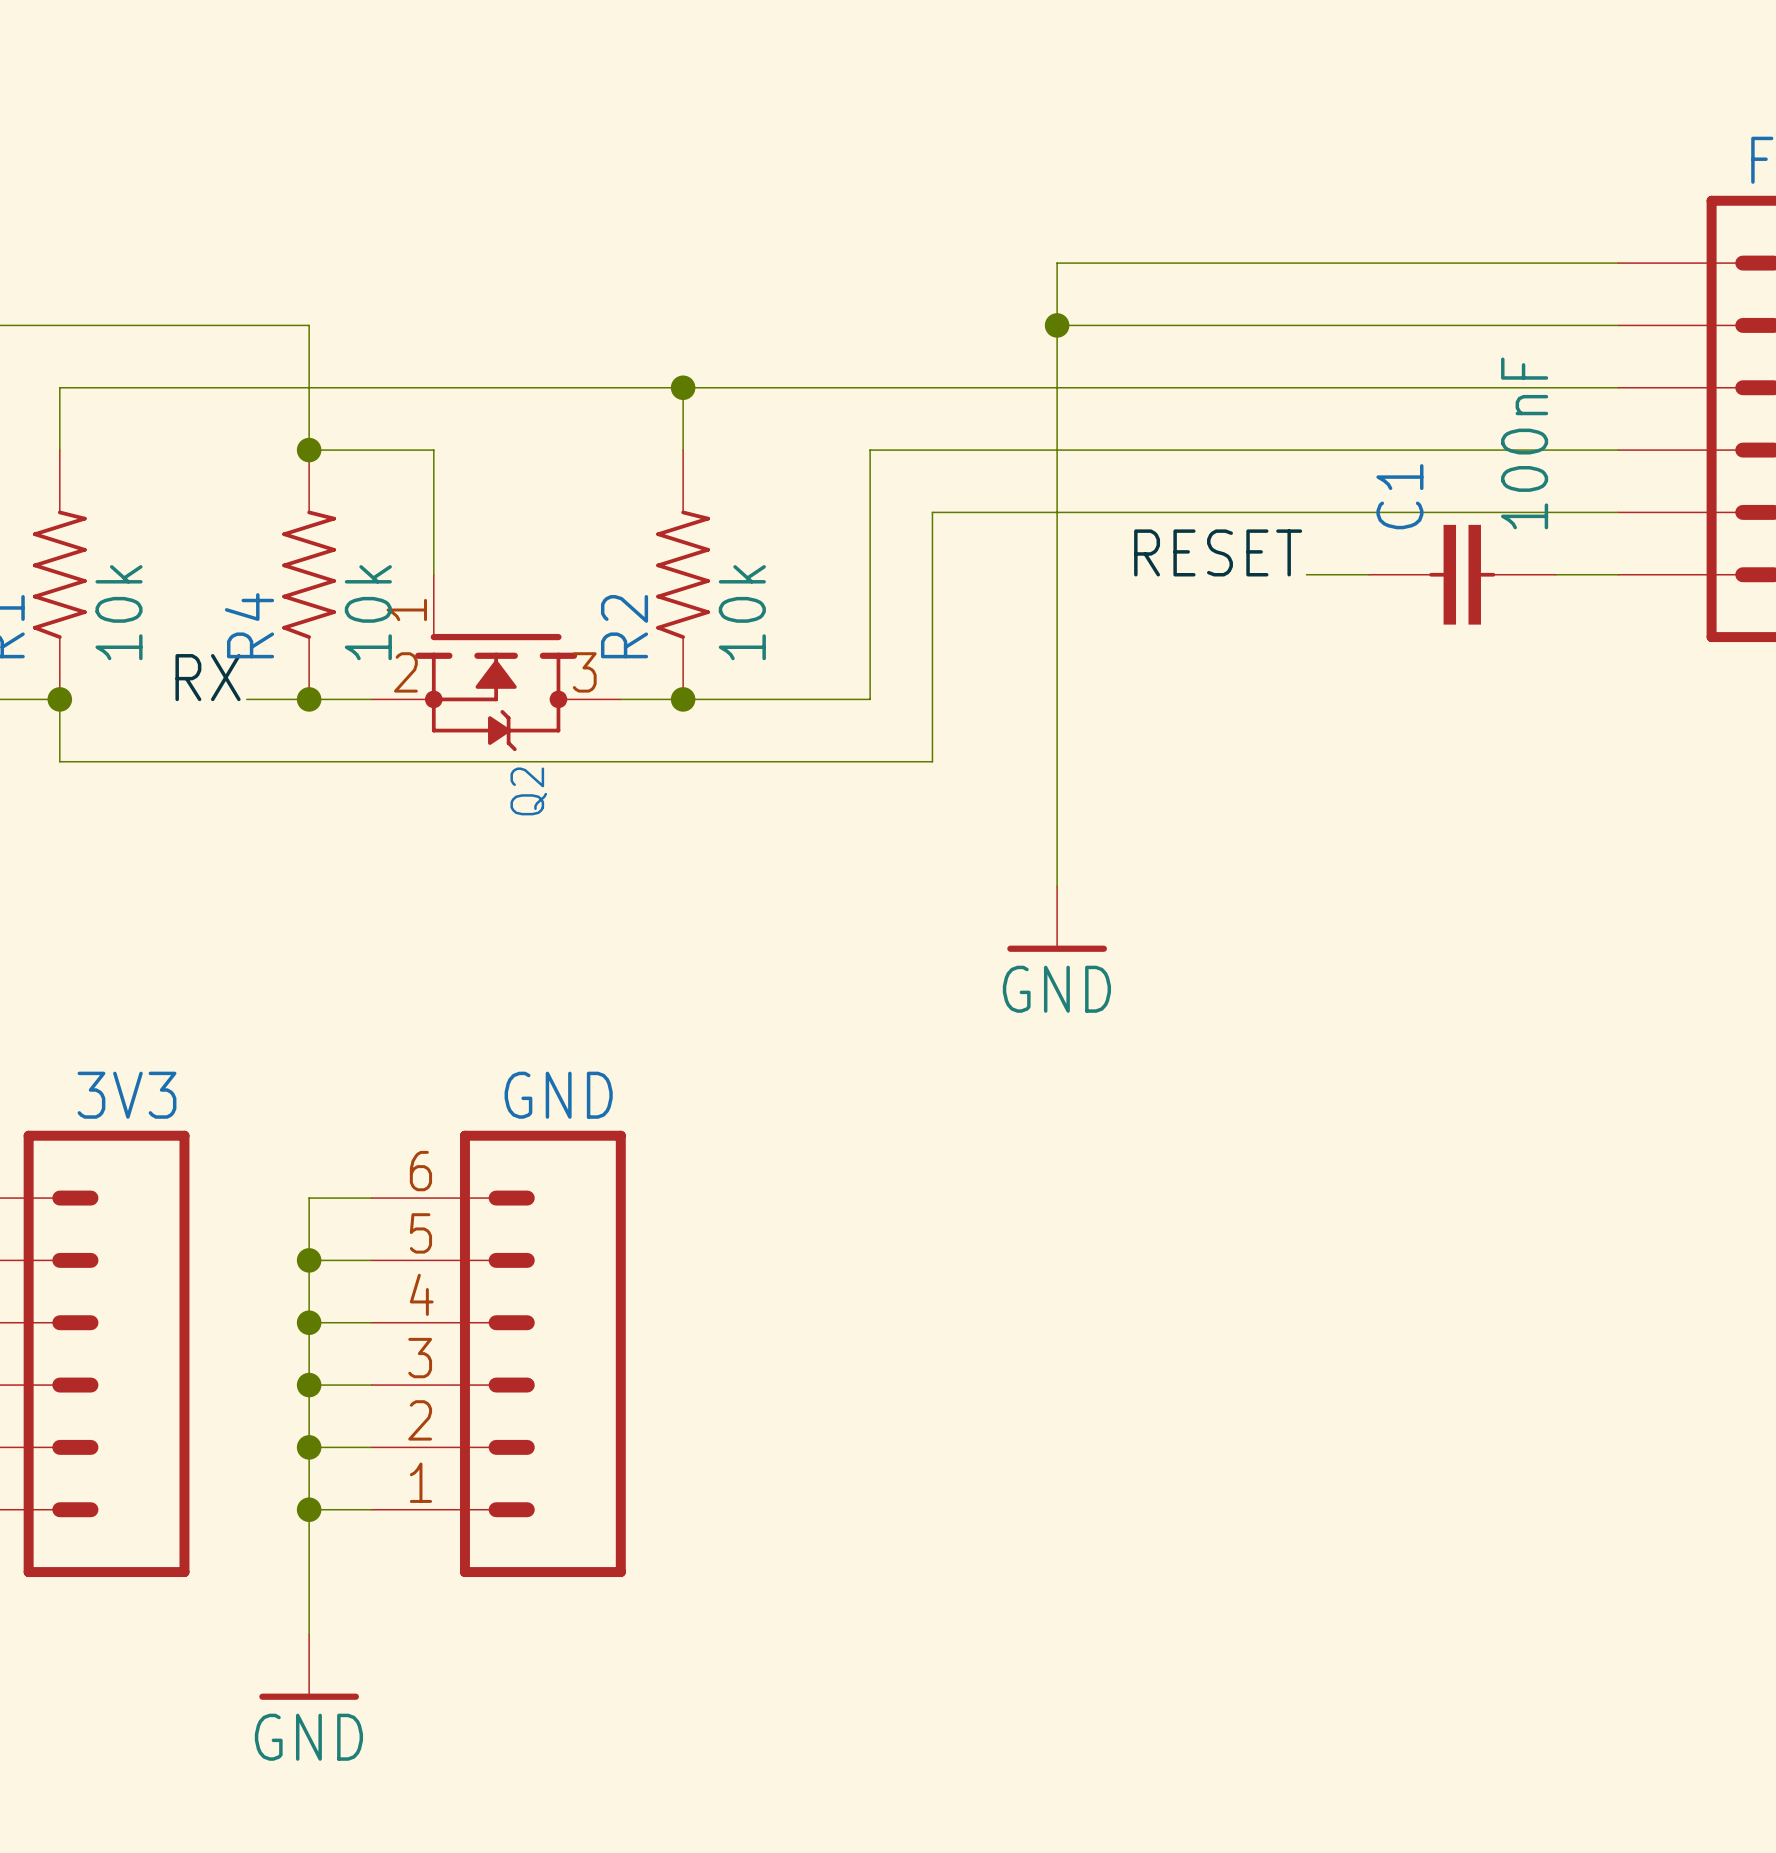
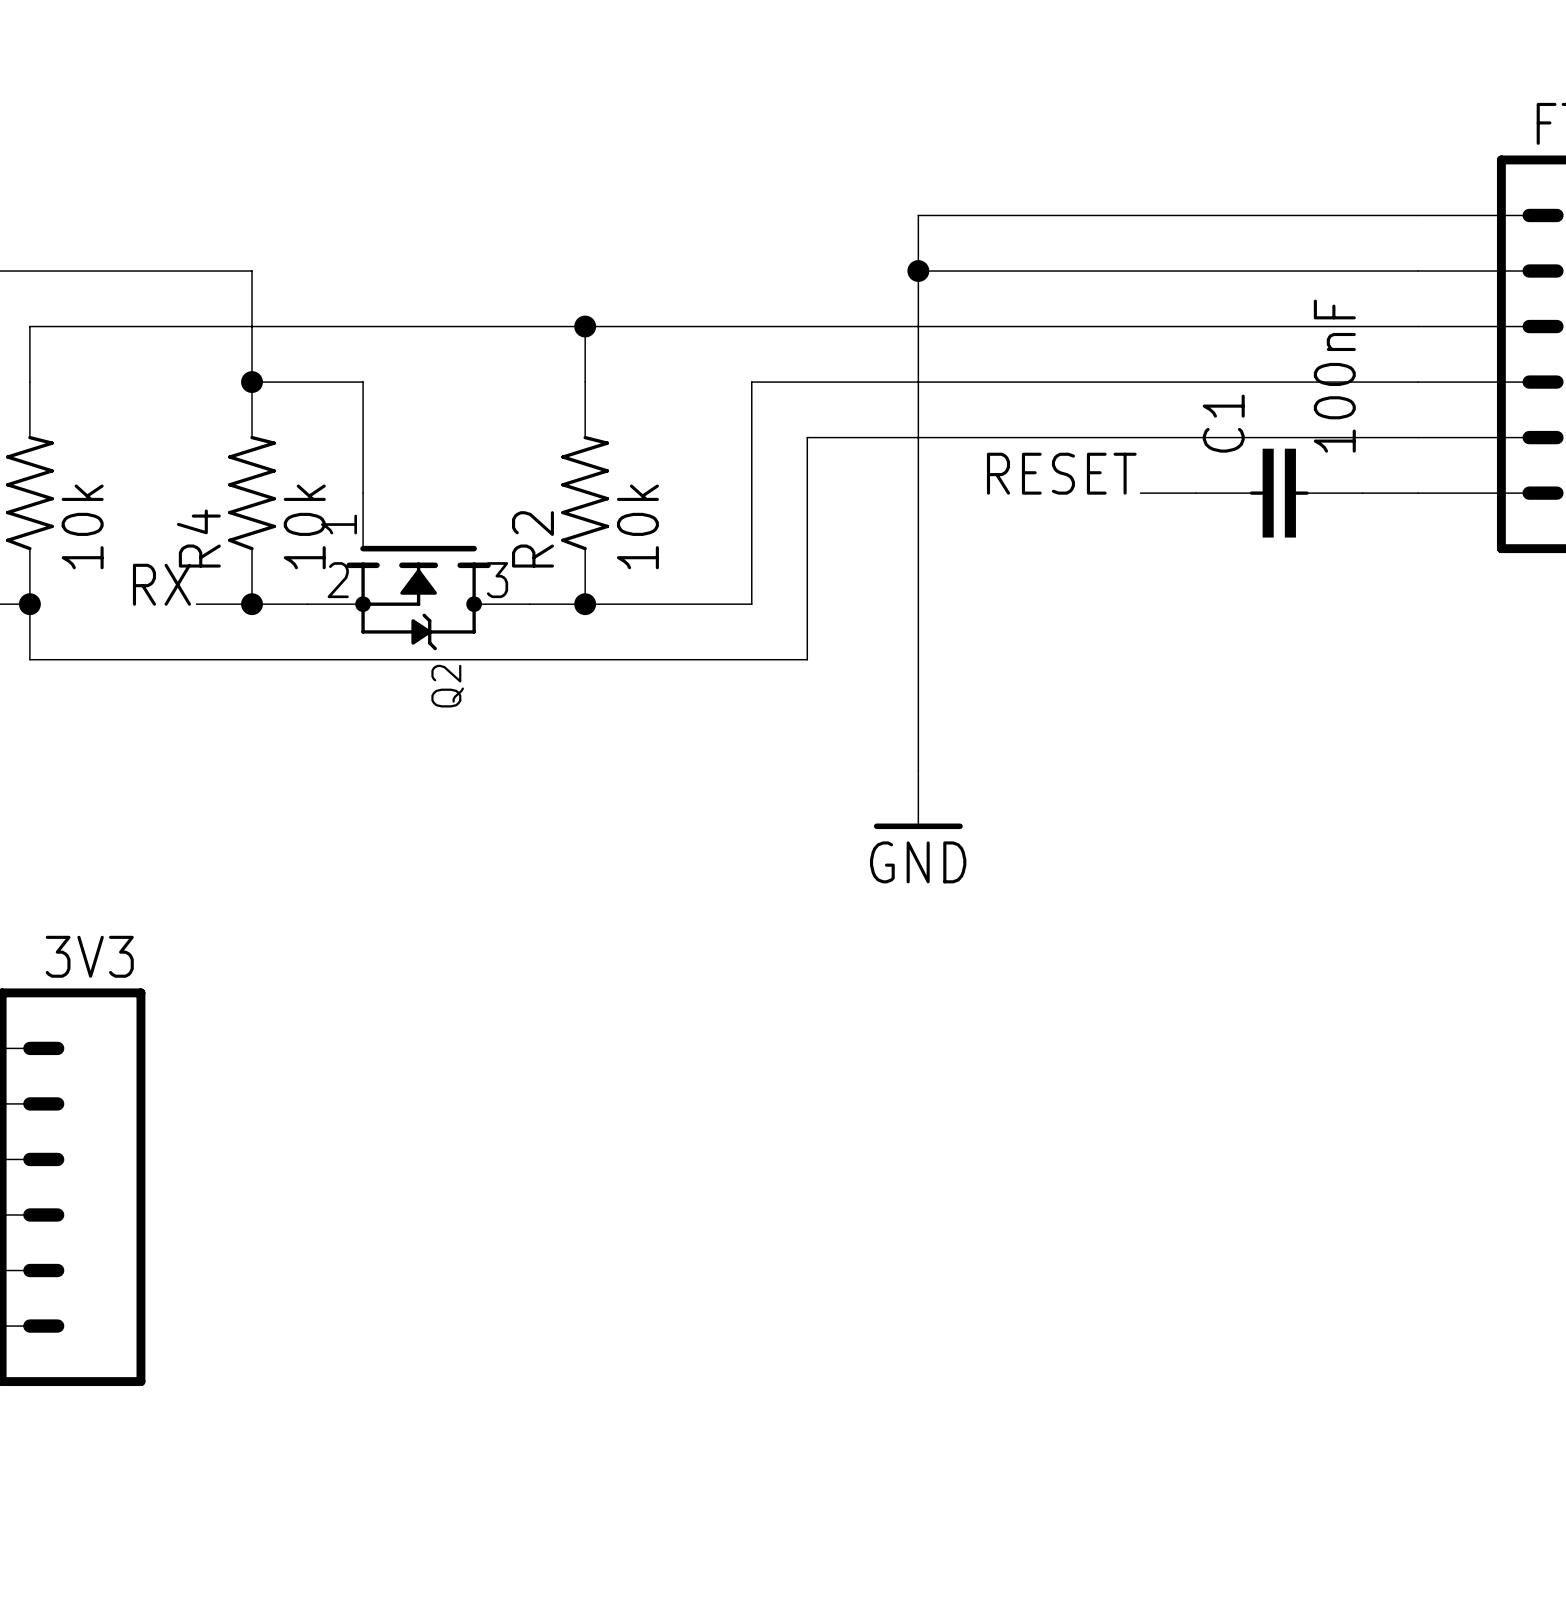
wire: (371, 1198) (309, 1198) (309, 1634) -> none
wire: (309, 1260) (371, 1260) -> none
junction: (309, 1260) -> none
wire: (309, 1322) (371, 1322) -> none
junction: (309, 1322) -> none
GND: (498, 1353) -> none
wire: (309, 1385) (371, 1385) -> none
junction: (309, 1385) -> none
wire: (309, 1447) (371, 1447) -> none
junction: (309, 1447) -> none
wire: (309, 1509) (371, 1509) -> none
junction: (309, 1509) -> none
power symbol: GND (309, 1667) -> none

